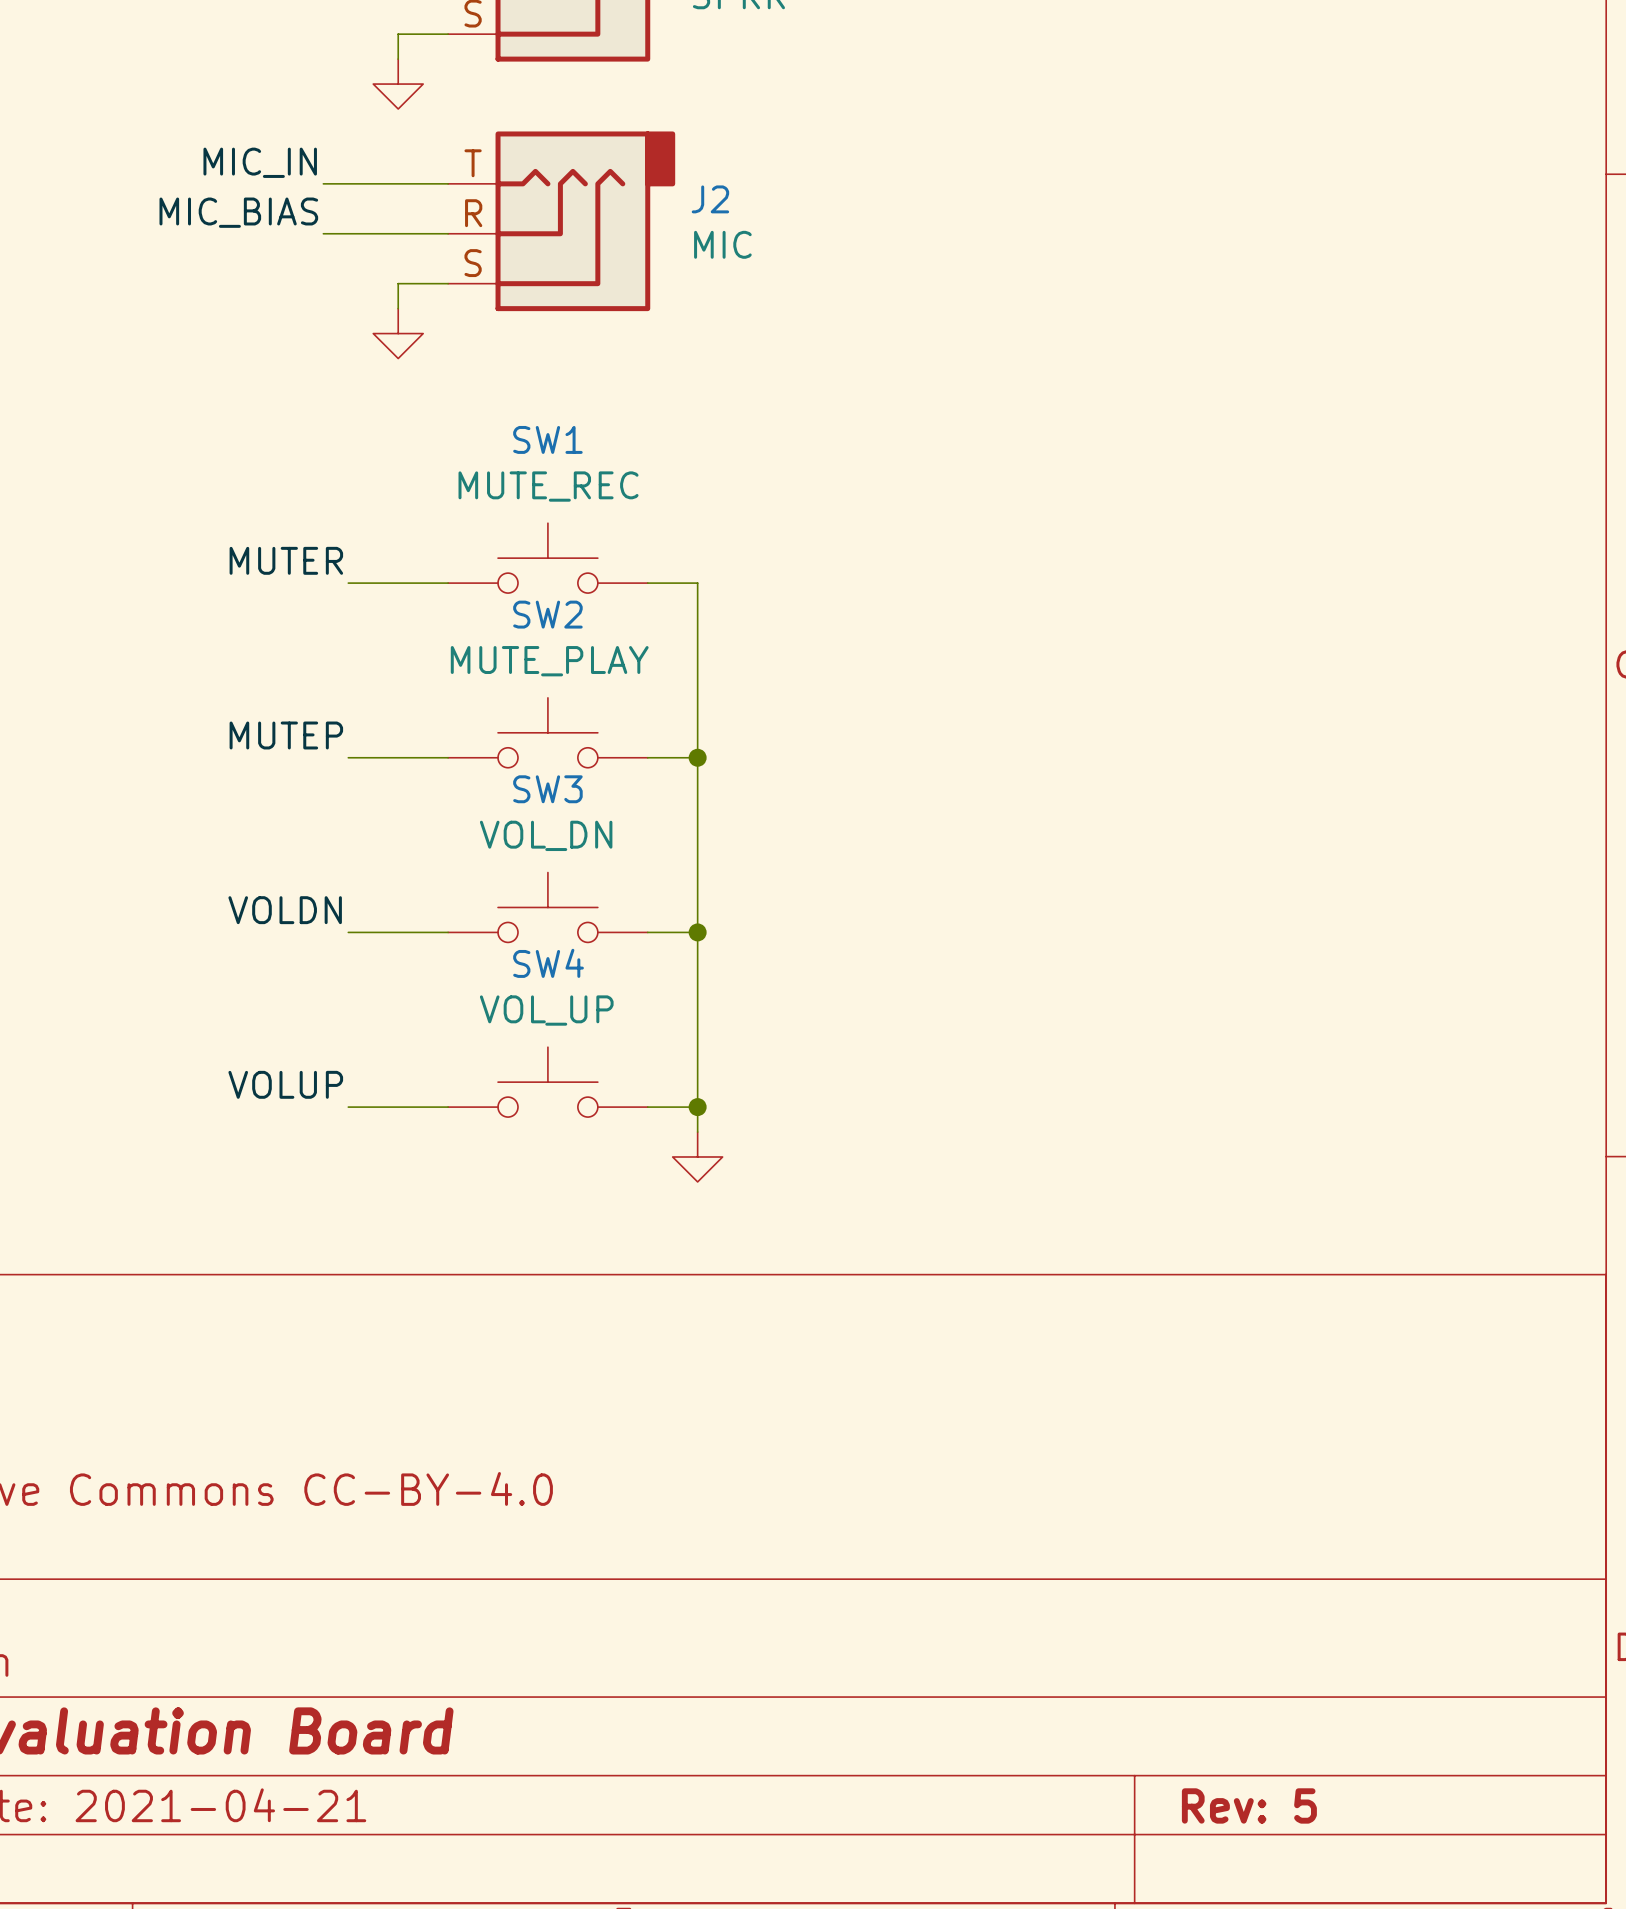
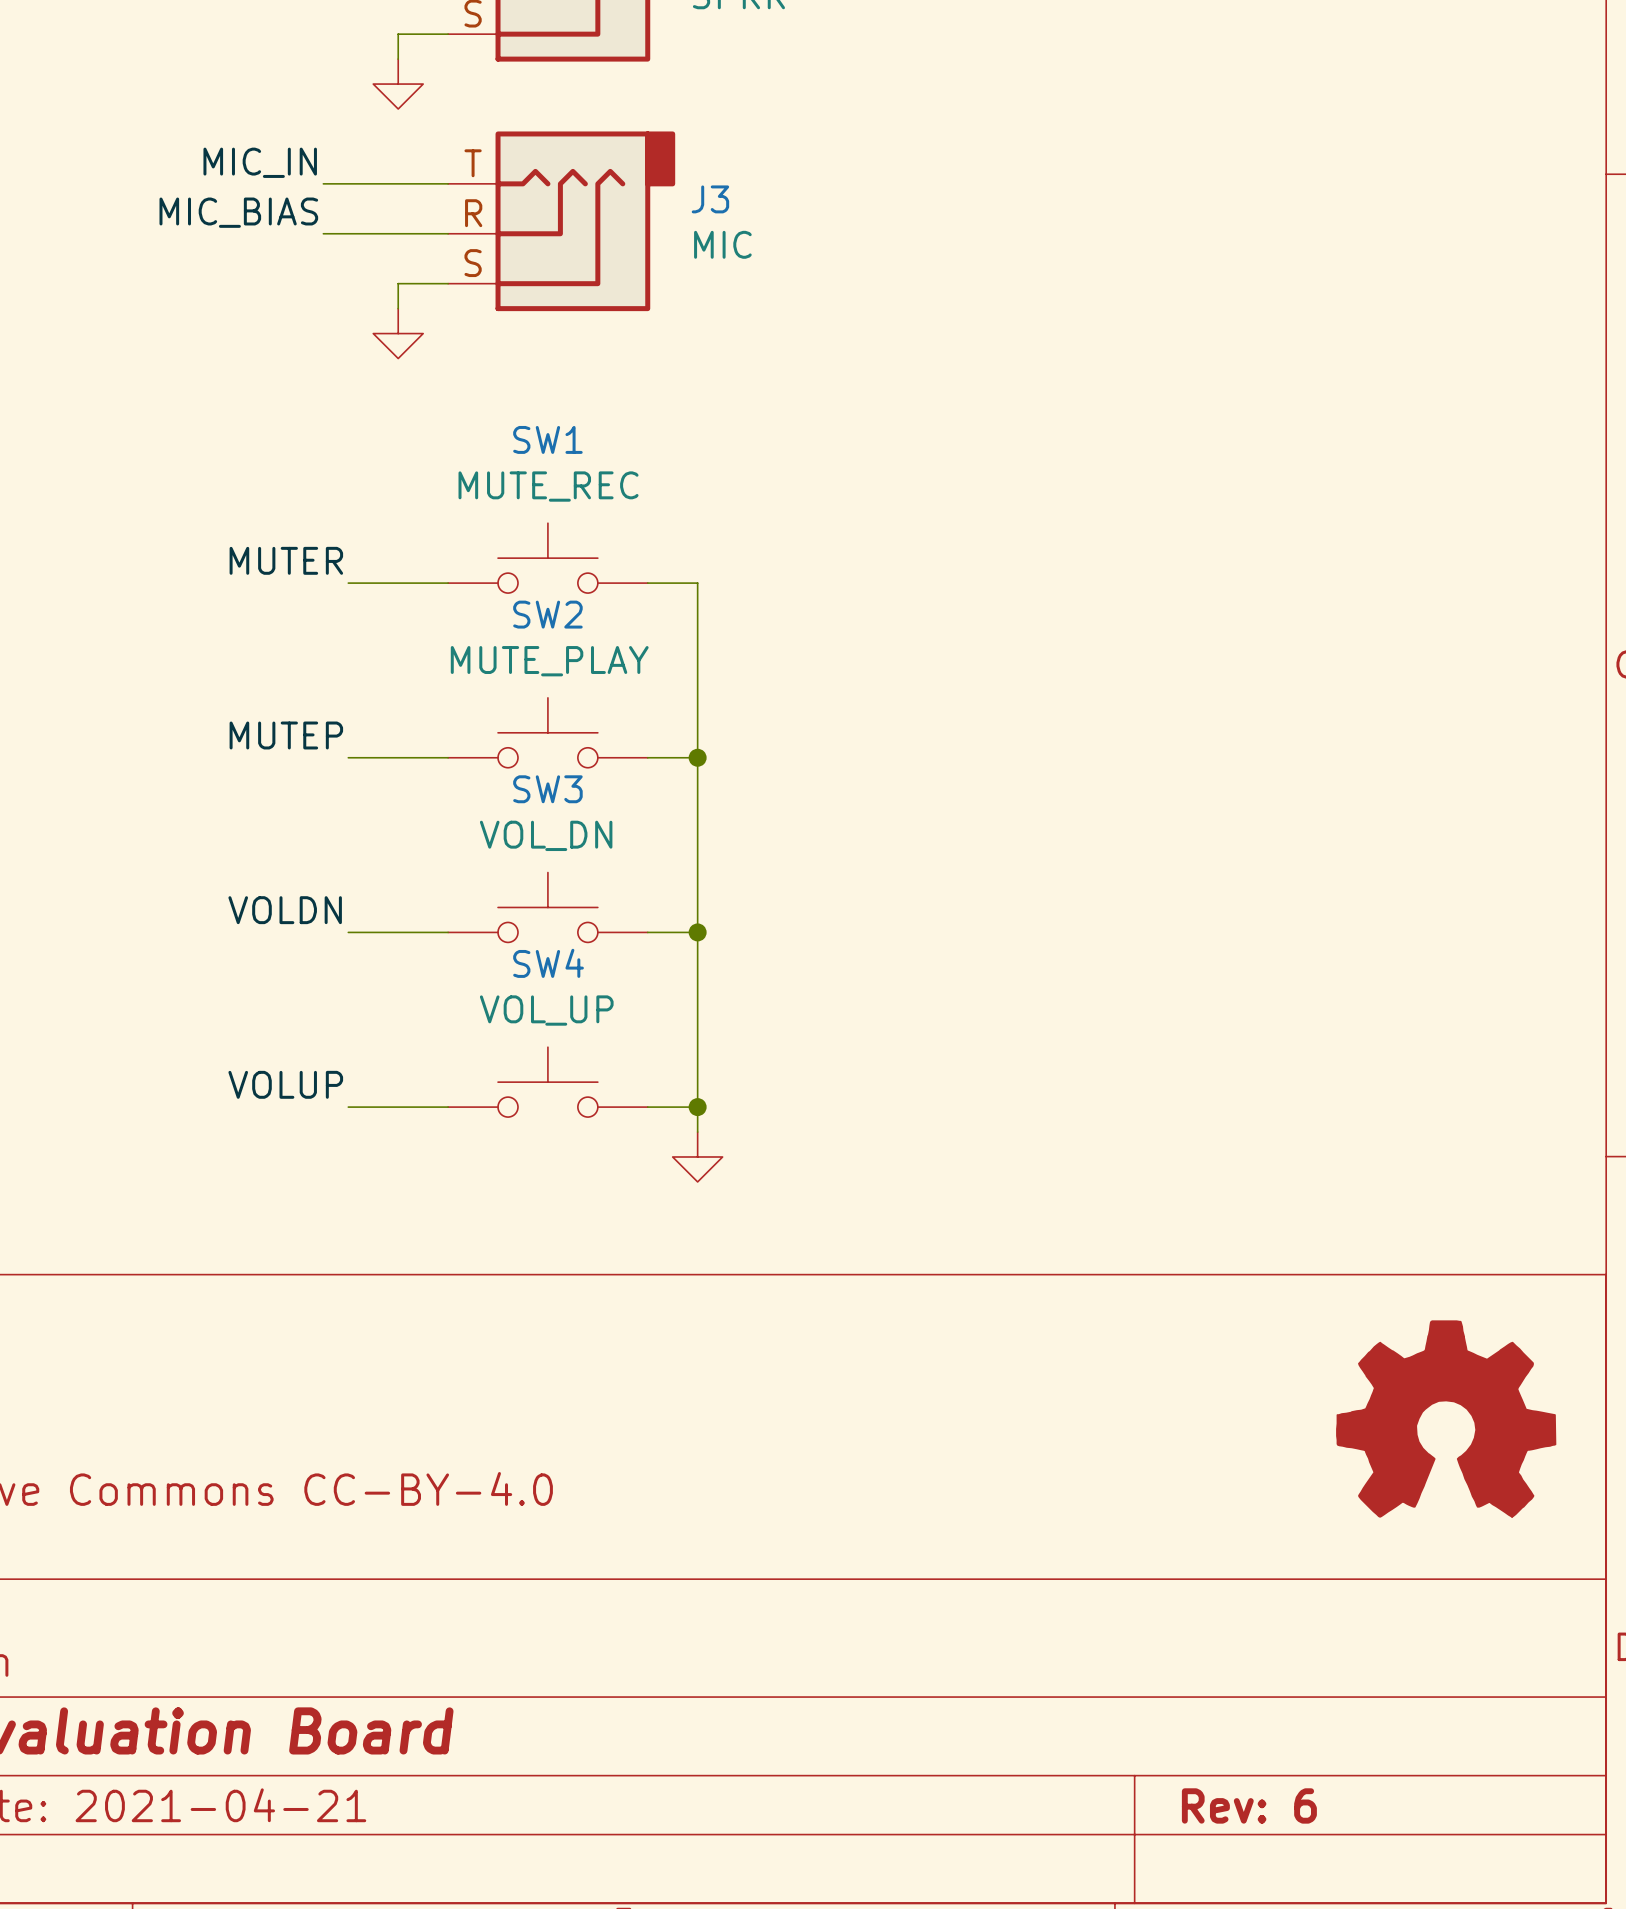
J2 name: J2 (710, 199) -> J3 (710, 199)
part: none -> (1446, 1418)
title block: Rev: 5 (1249, 1805) -> Rev: 6 (1249, 1805)

